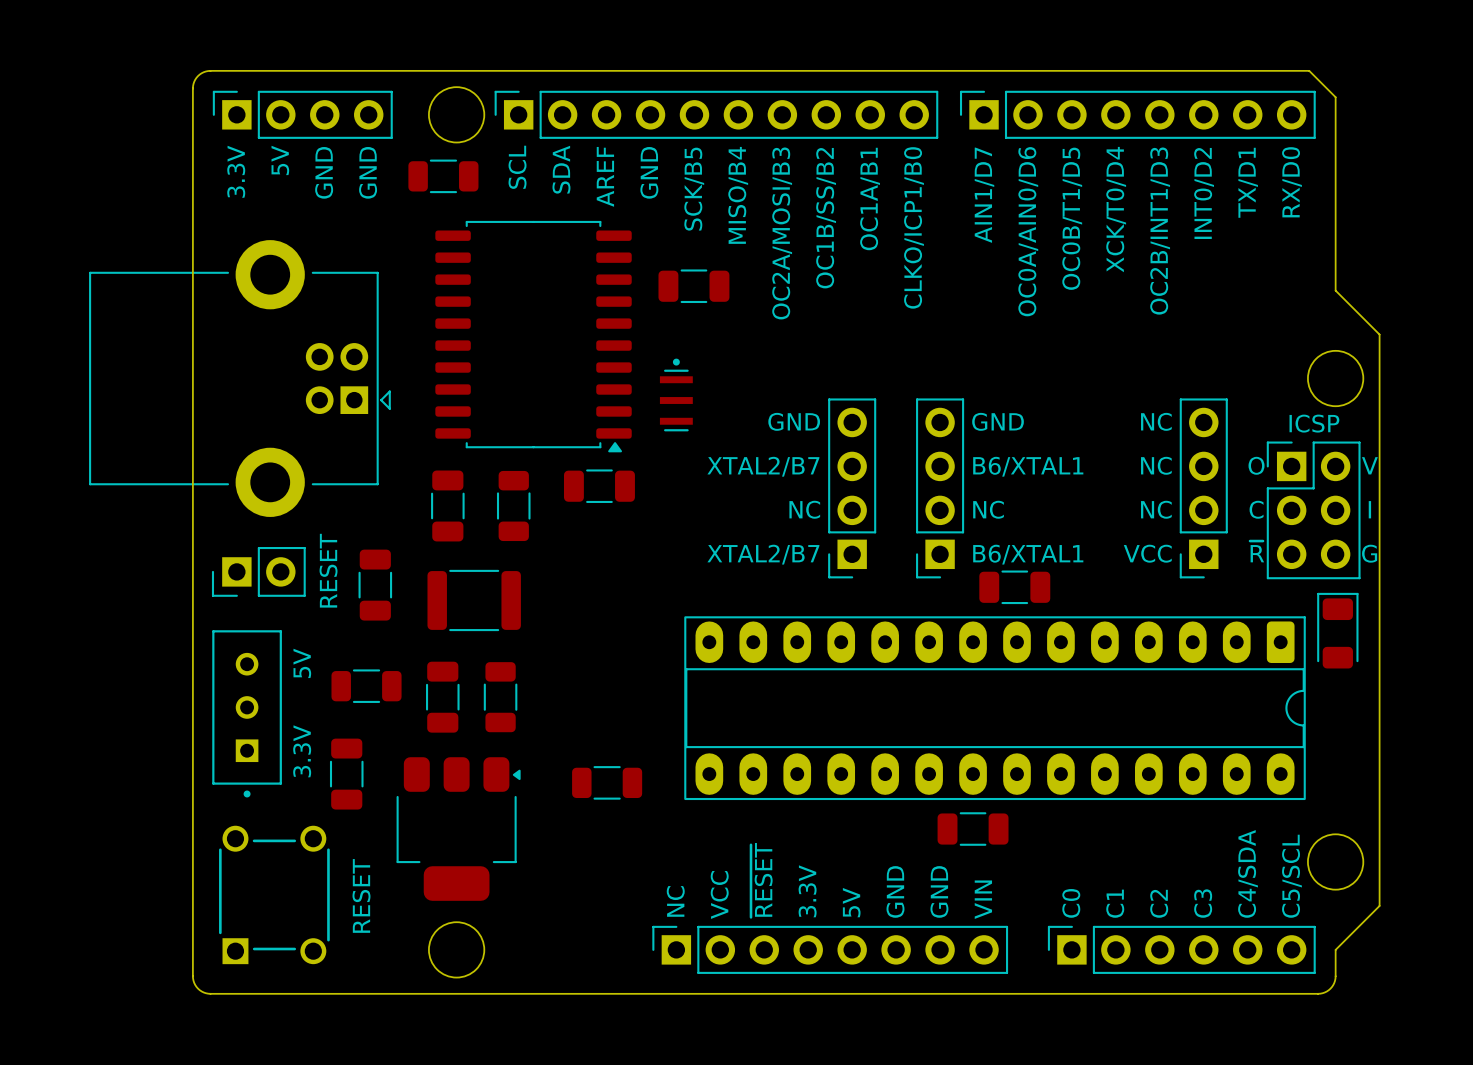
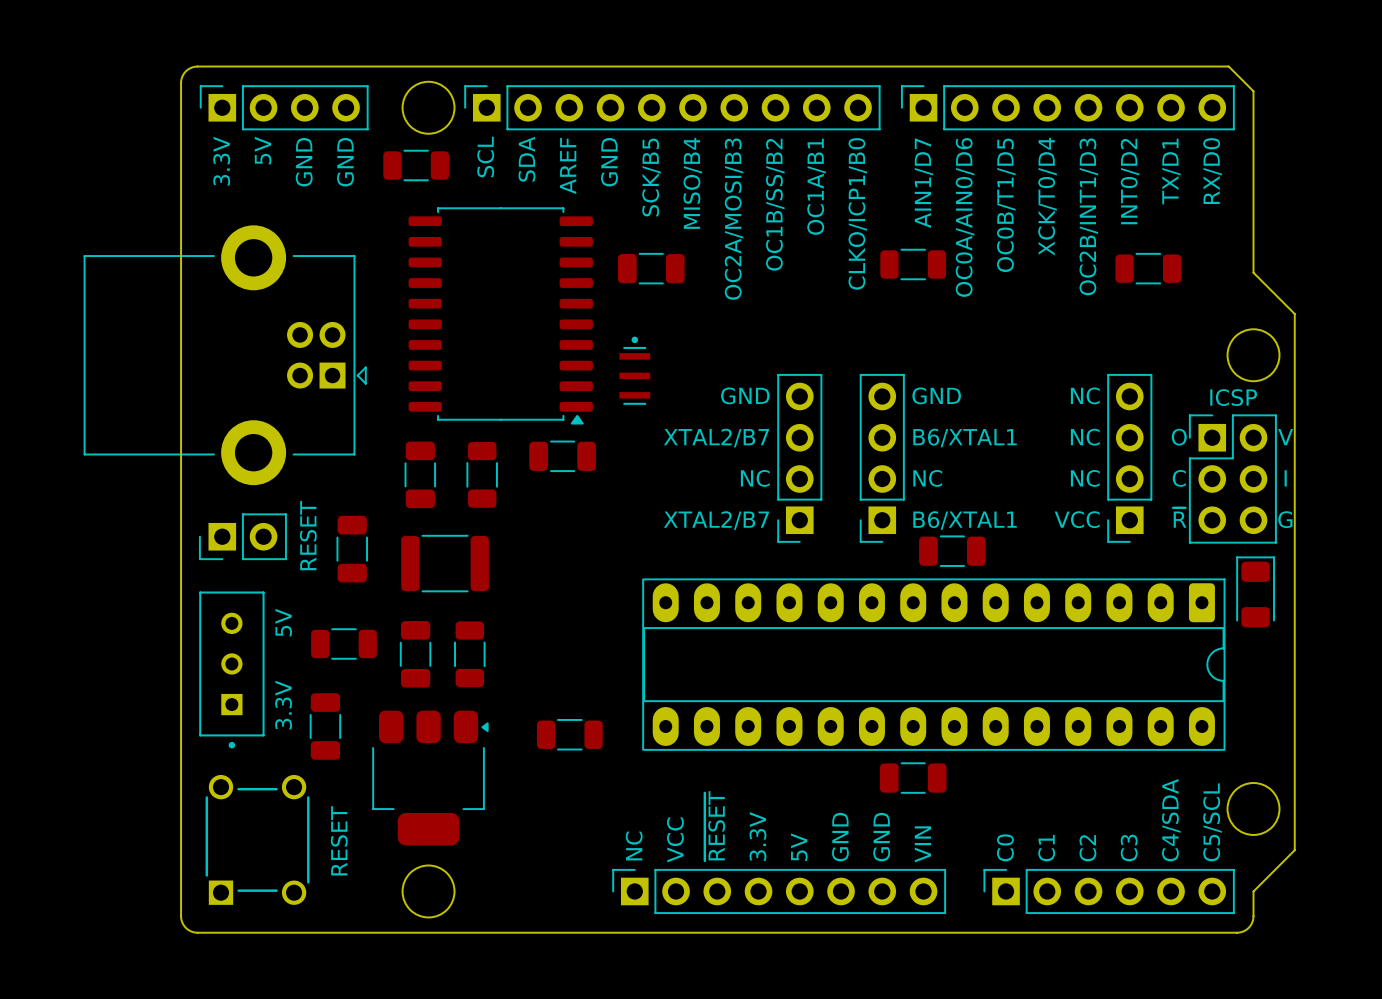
part: none -> (913, 264)
part: none -> (1148, 268)

